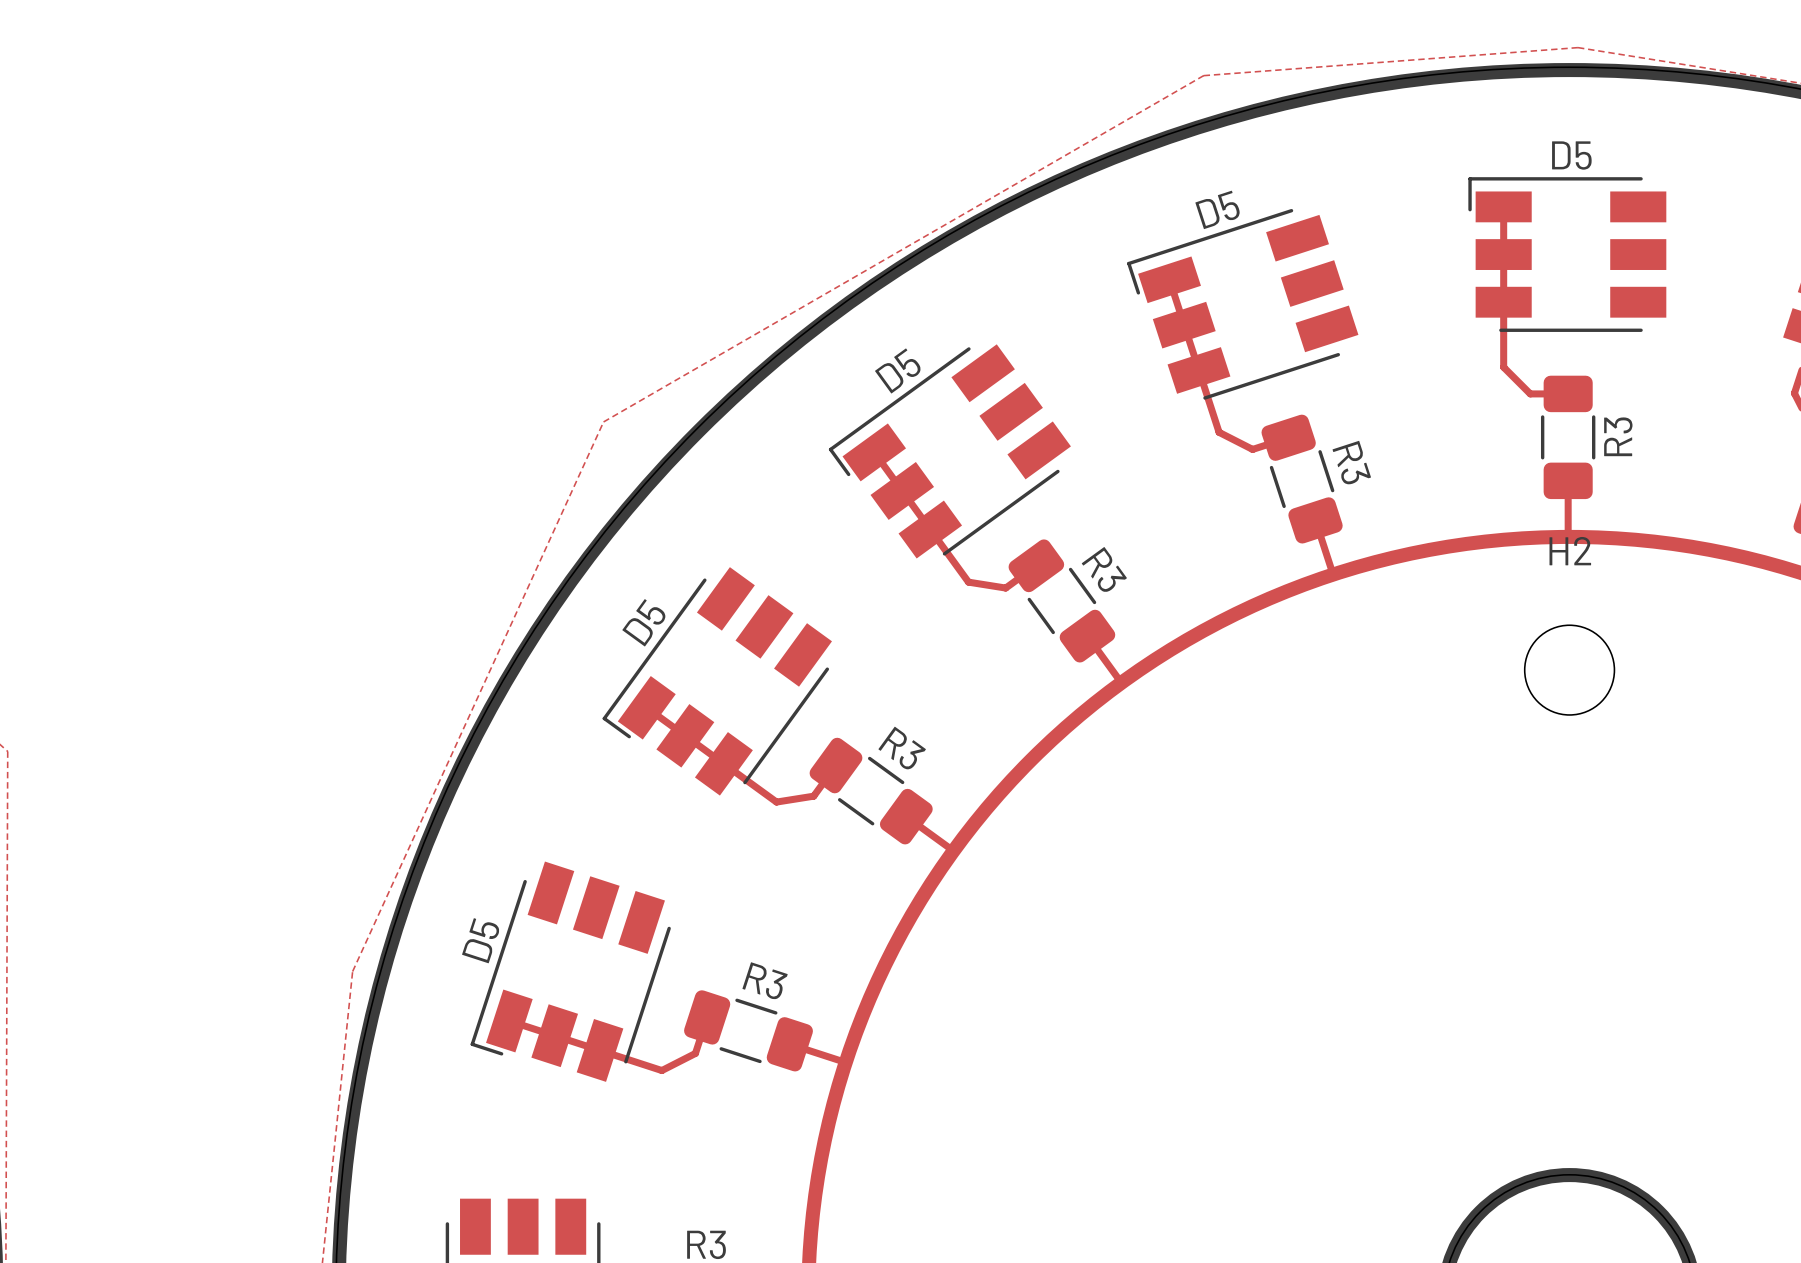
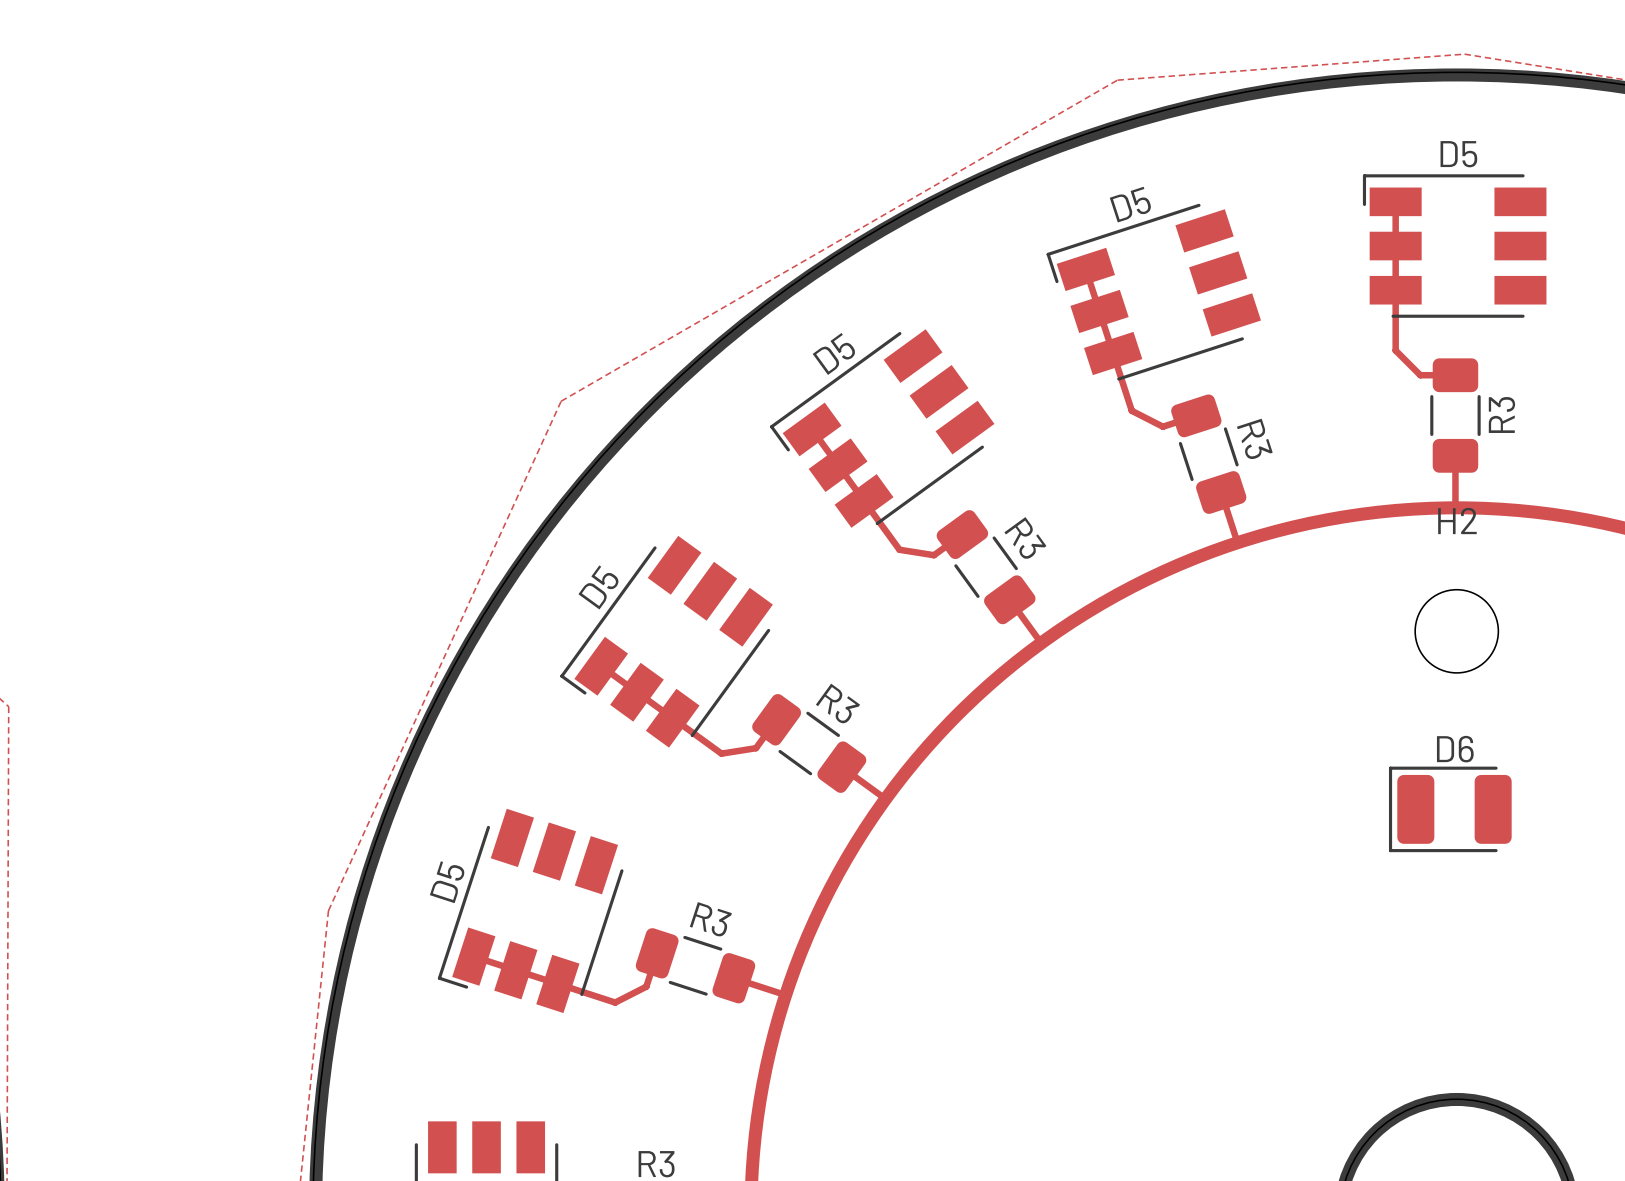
D6: none -> (1450, 809)

